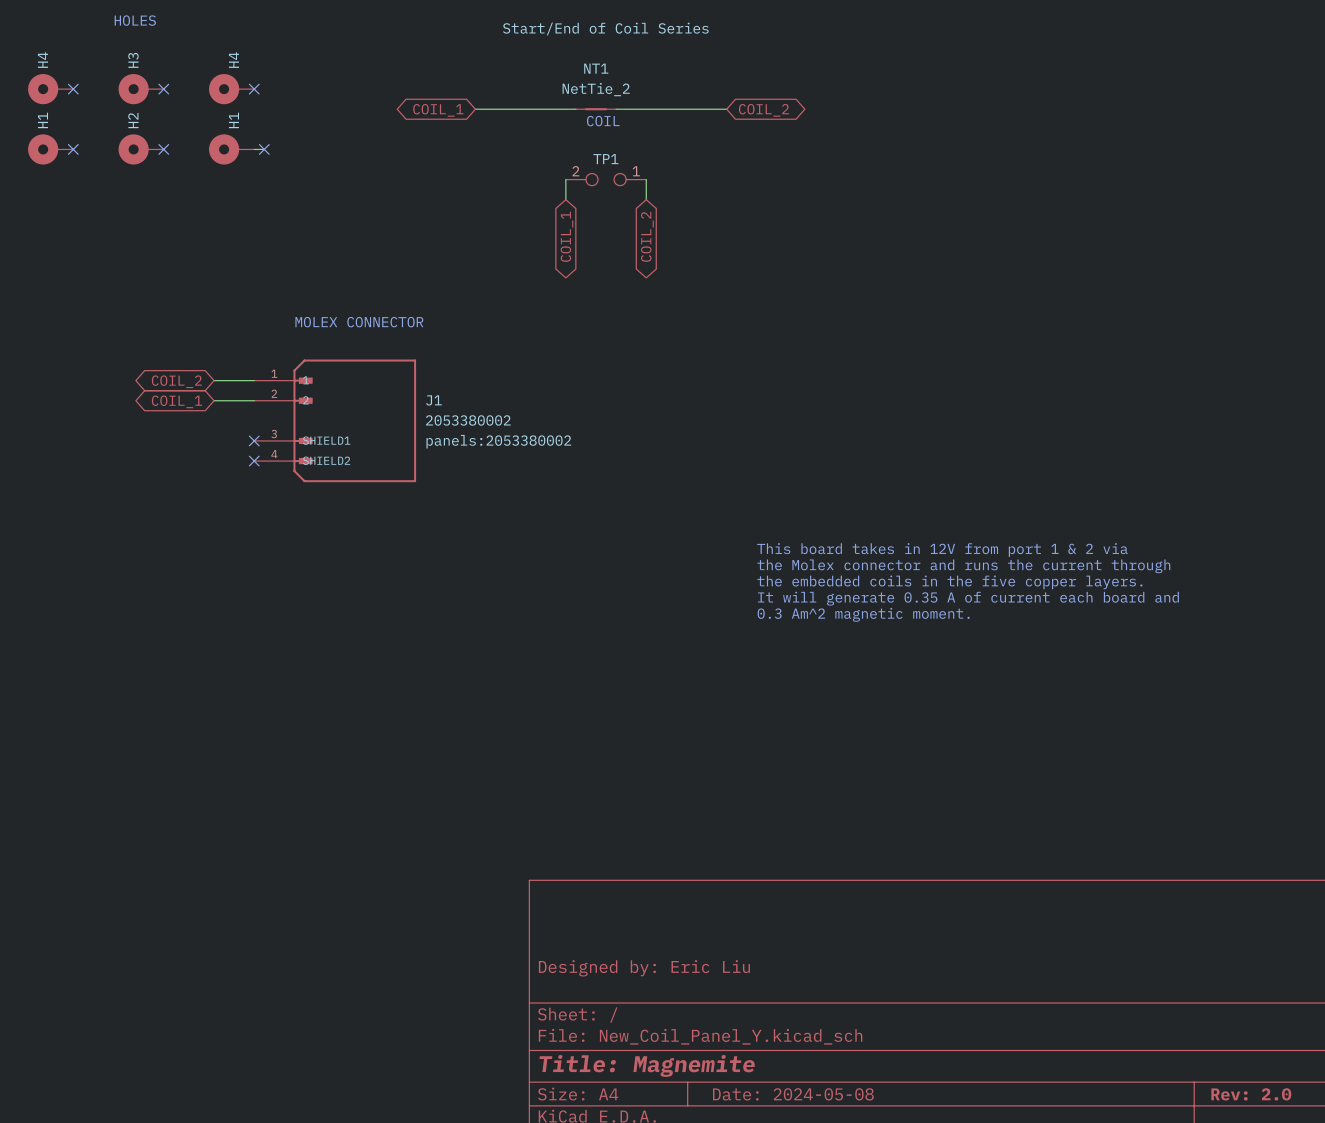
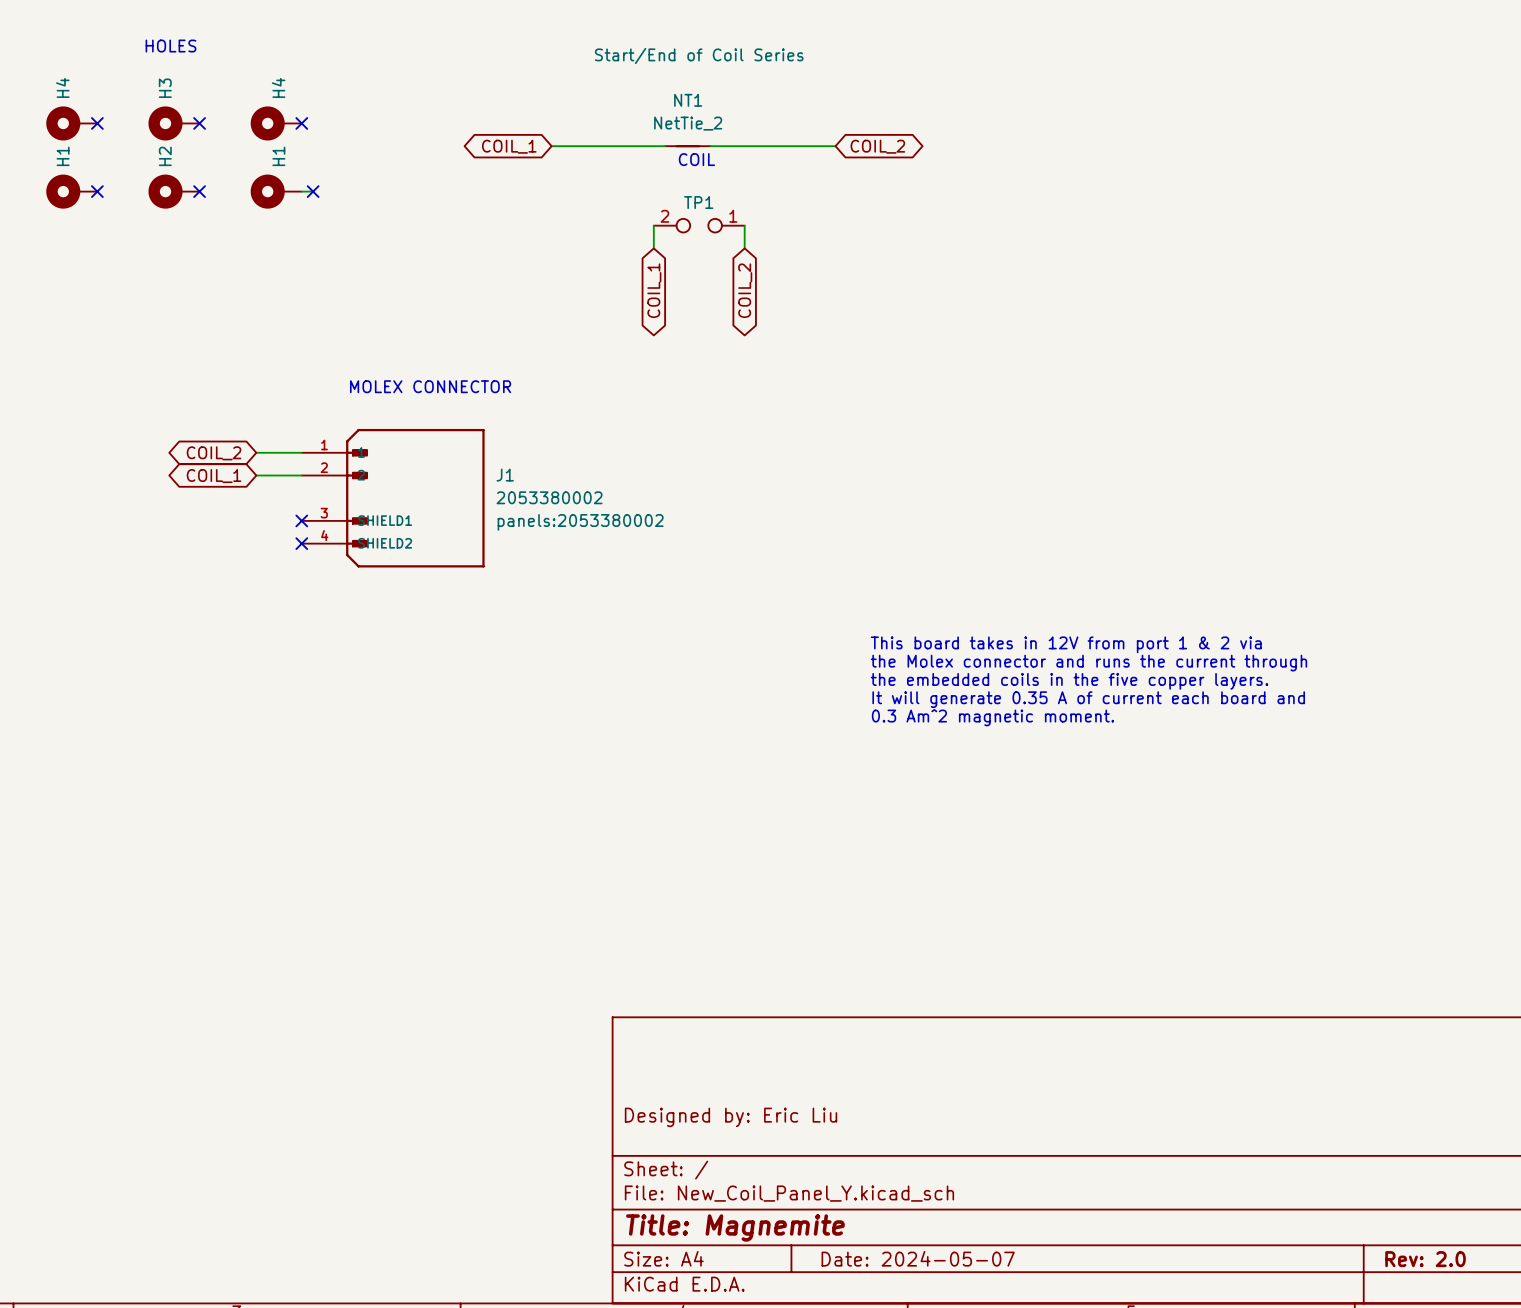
title block: Date: 2024-05-08 (793, 1094) -> Date: 2024-05-07 (918, 1258)

